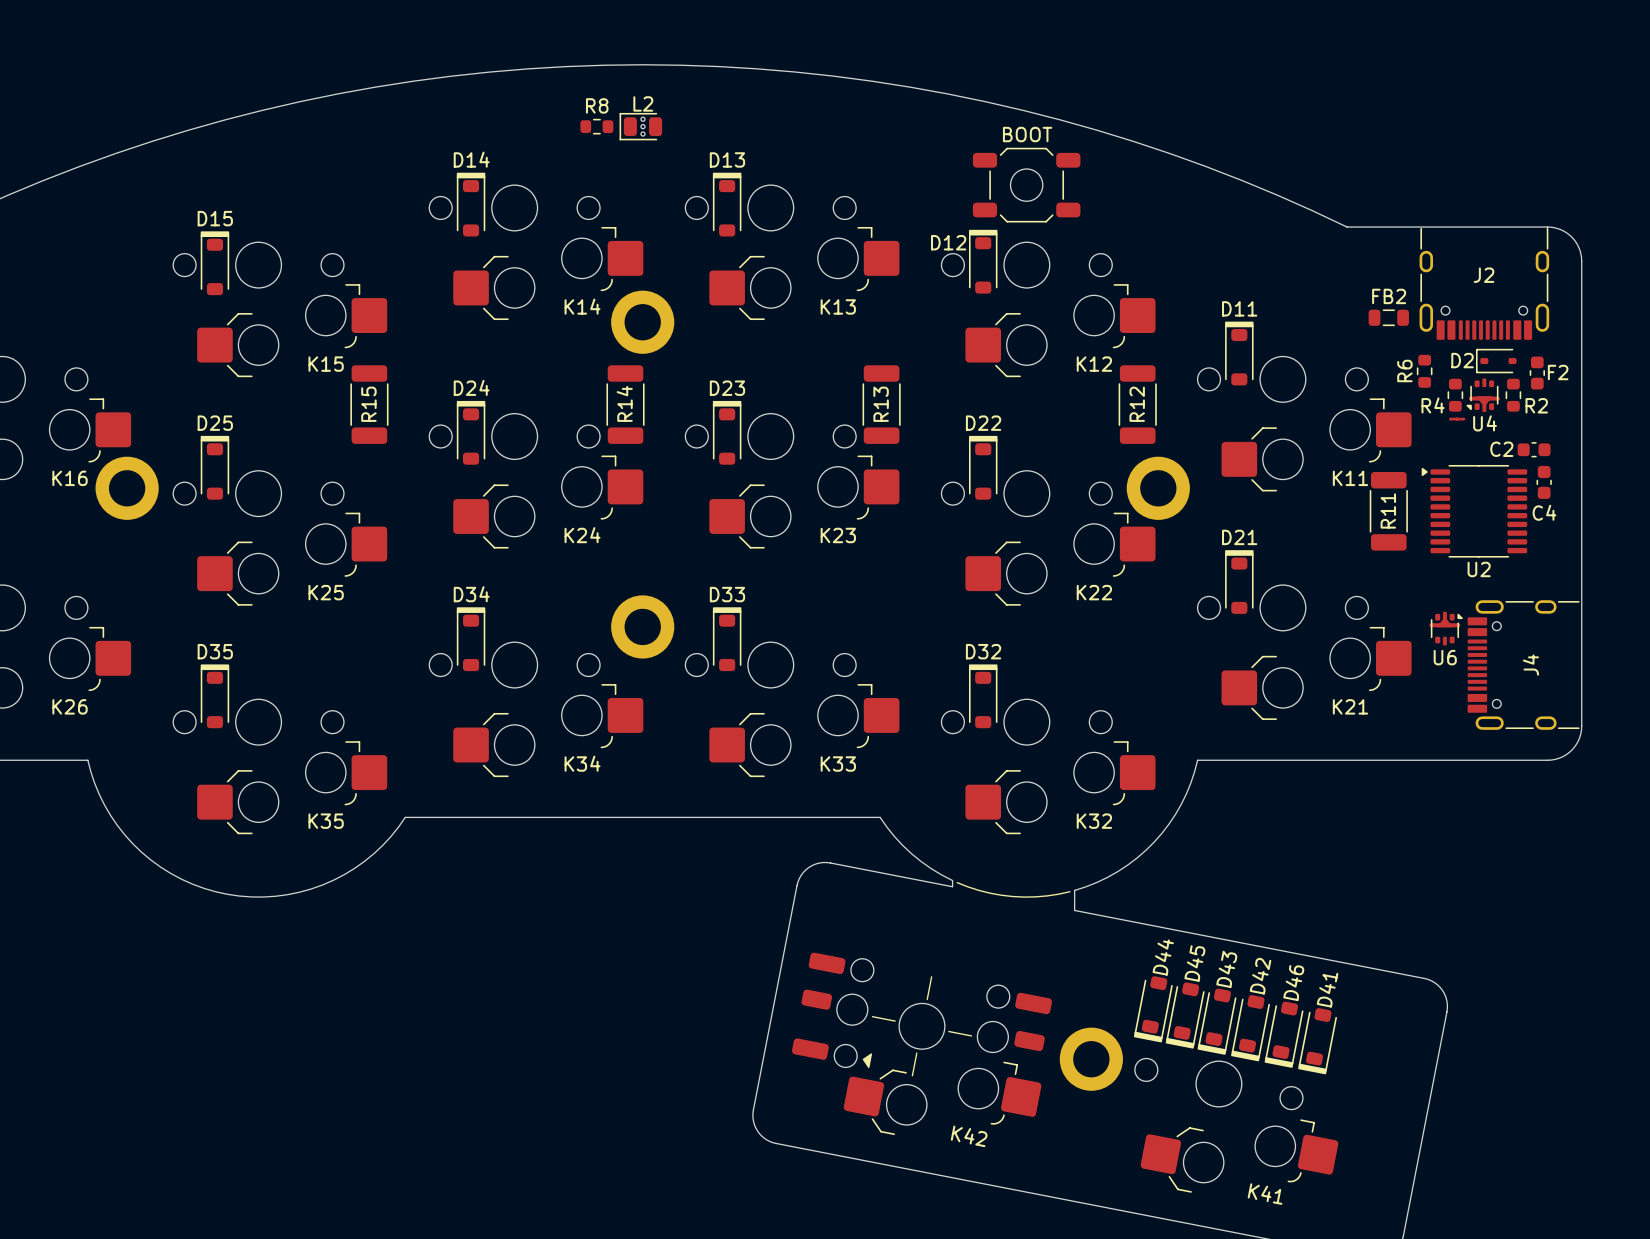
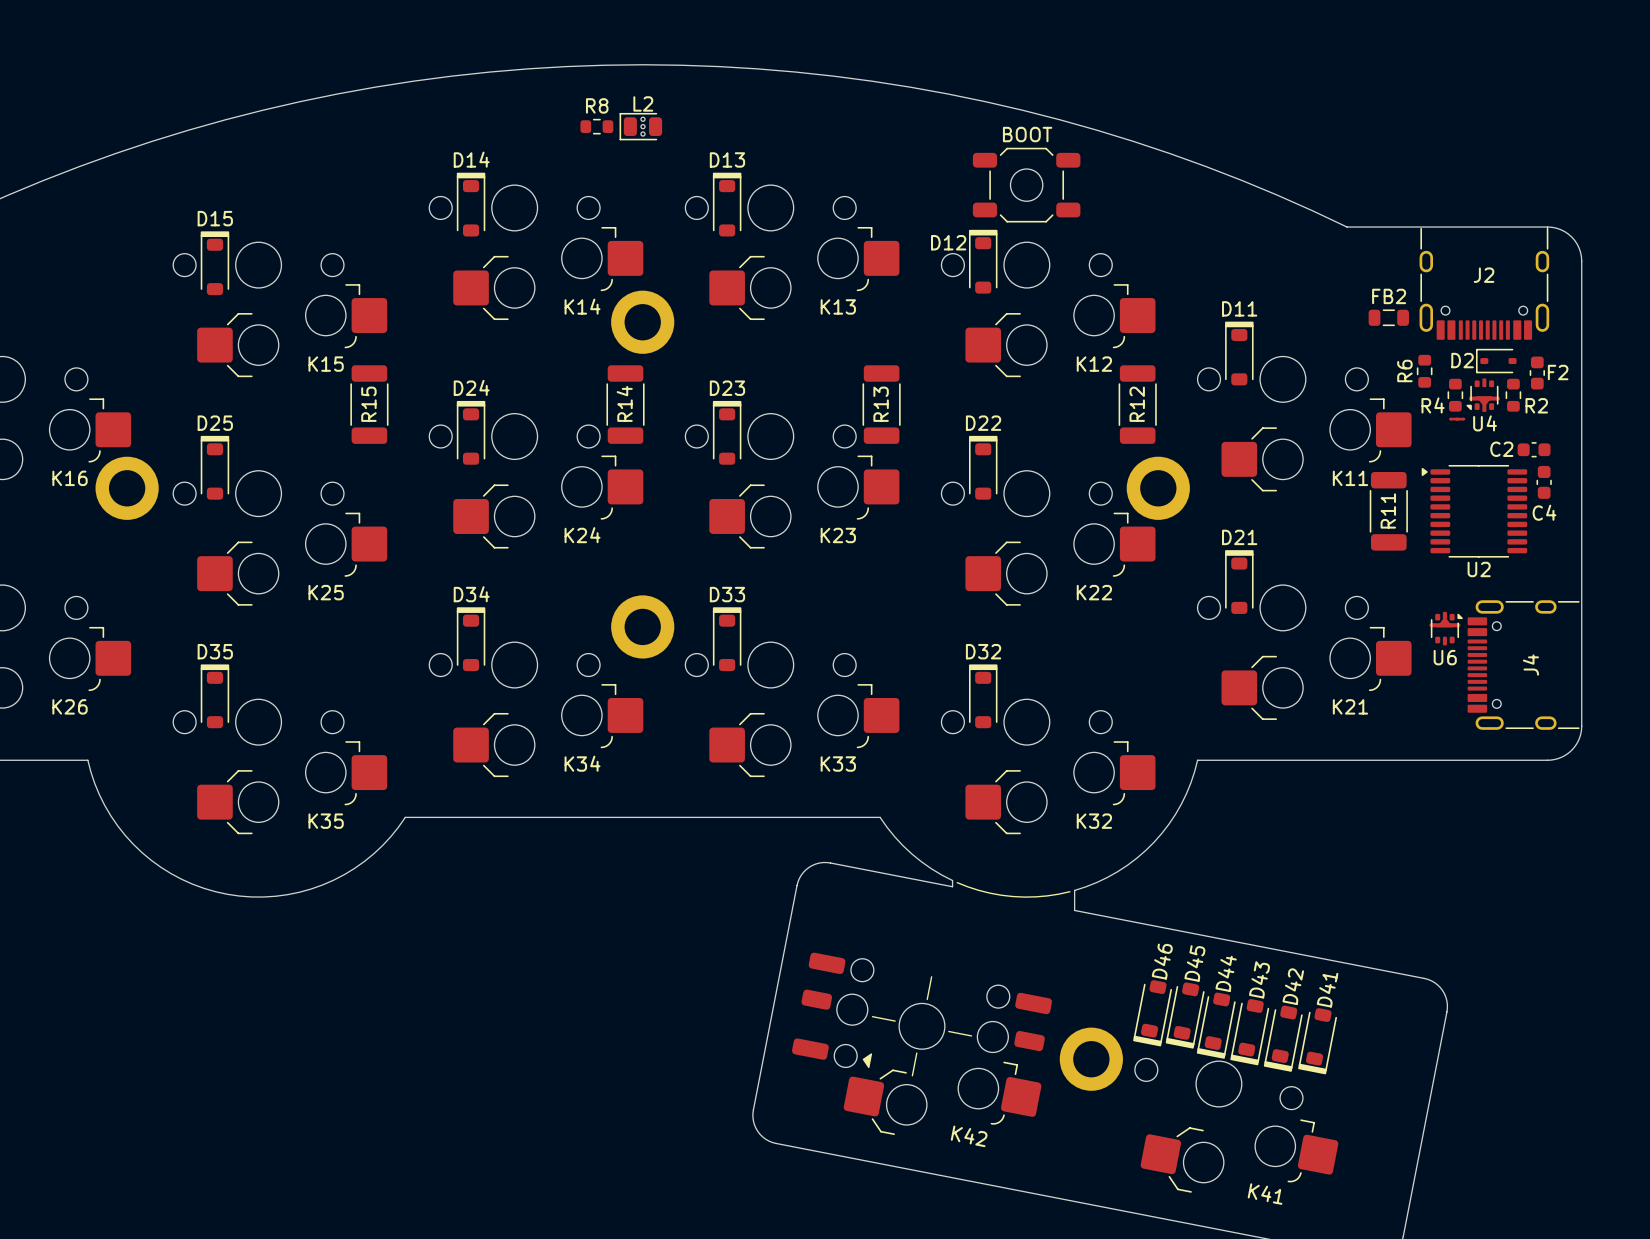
D44 position: (1153, 1009) -> (1216, 1025)
D43 position: (1217, 1021) -> (1249, 1032)
D42 position: (1250, 1028) -> (1283, 1038)
D46 position: (1284, 1034) -> (1152, 1013)

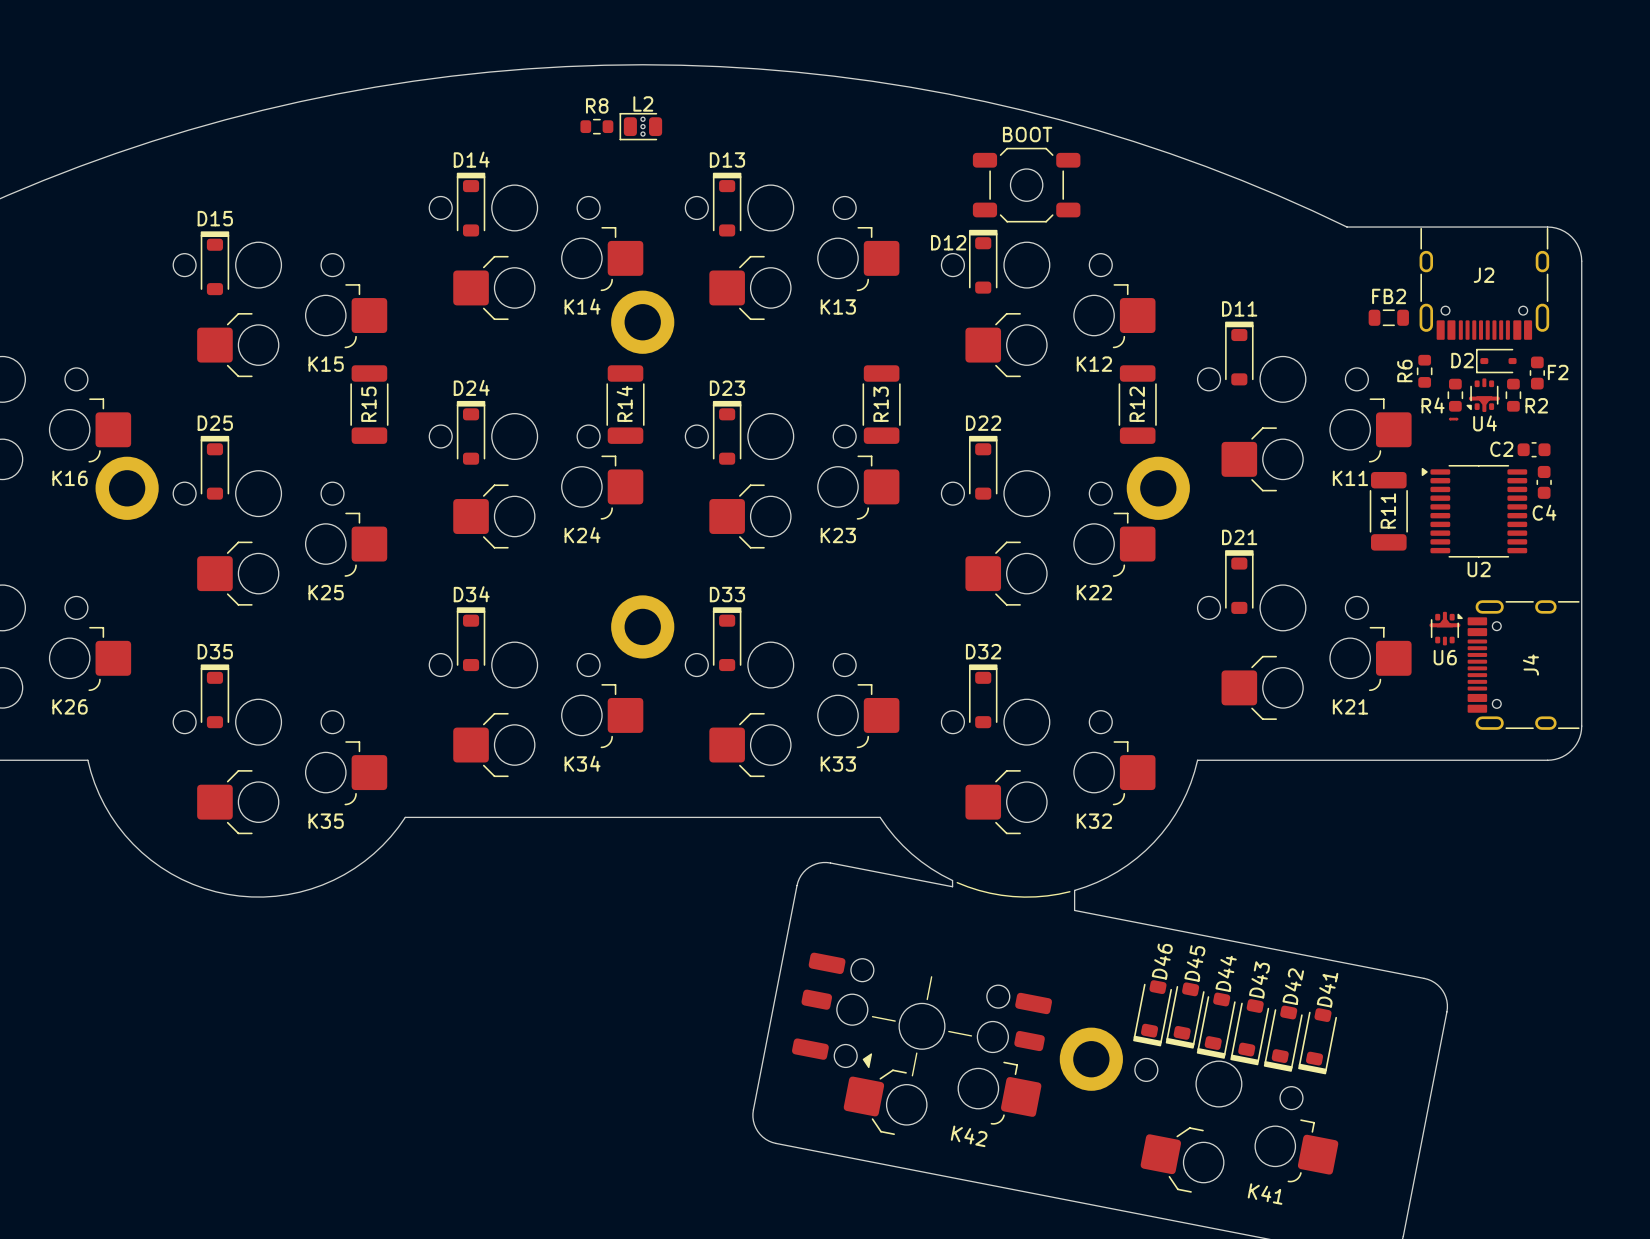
part footprint: [1449, 417, 1466, 421] -> [1448, 417, 1459, 421]

